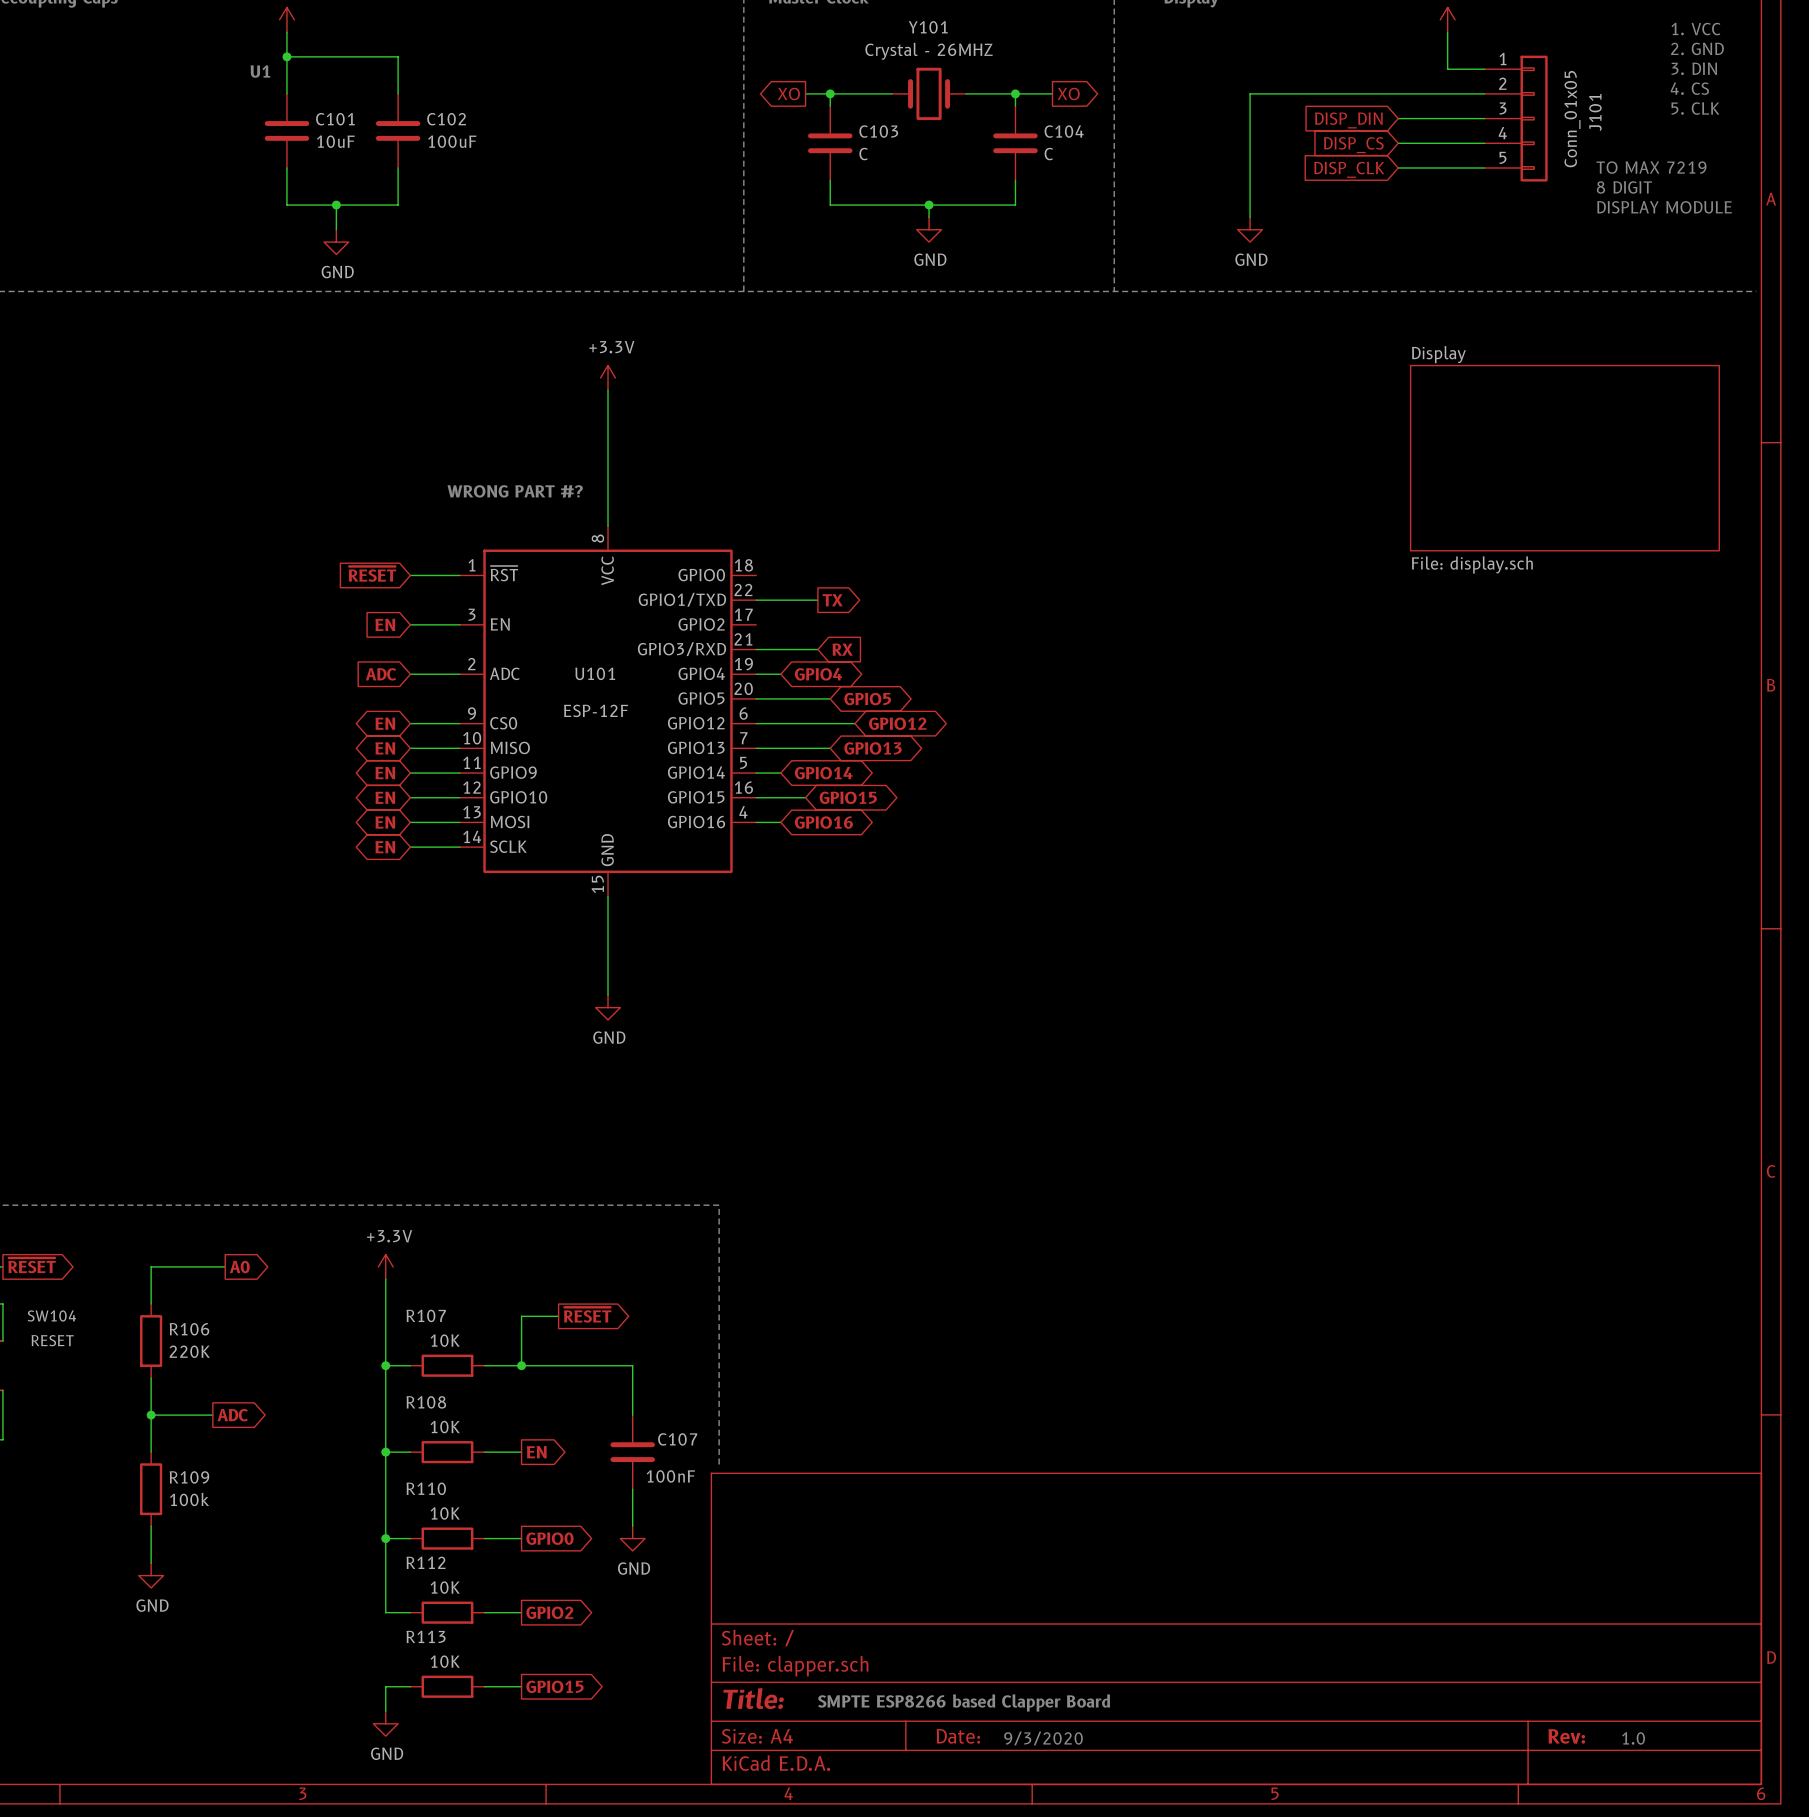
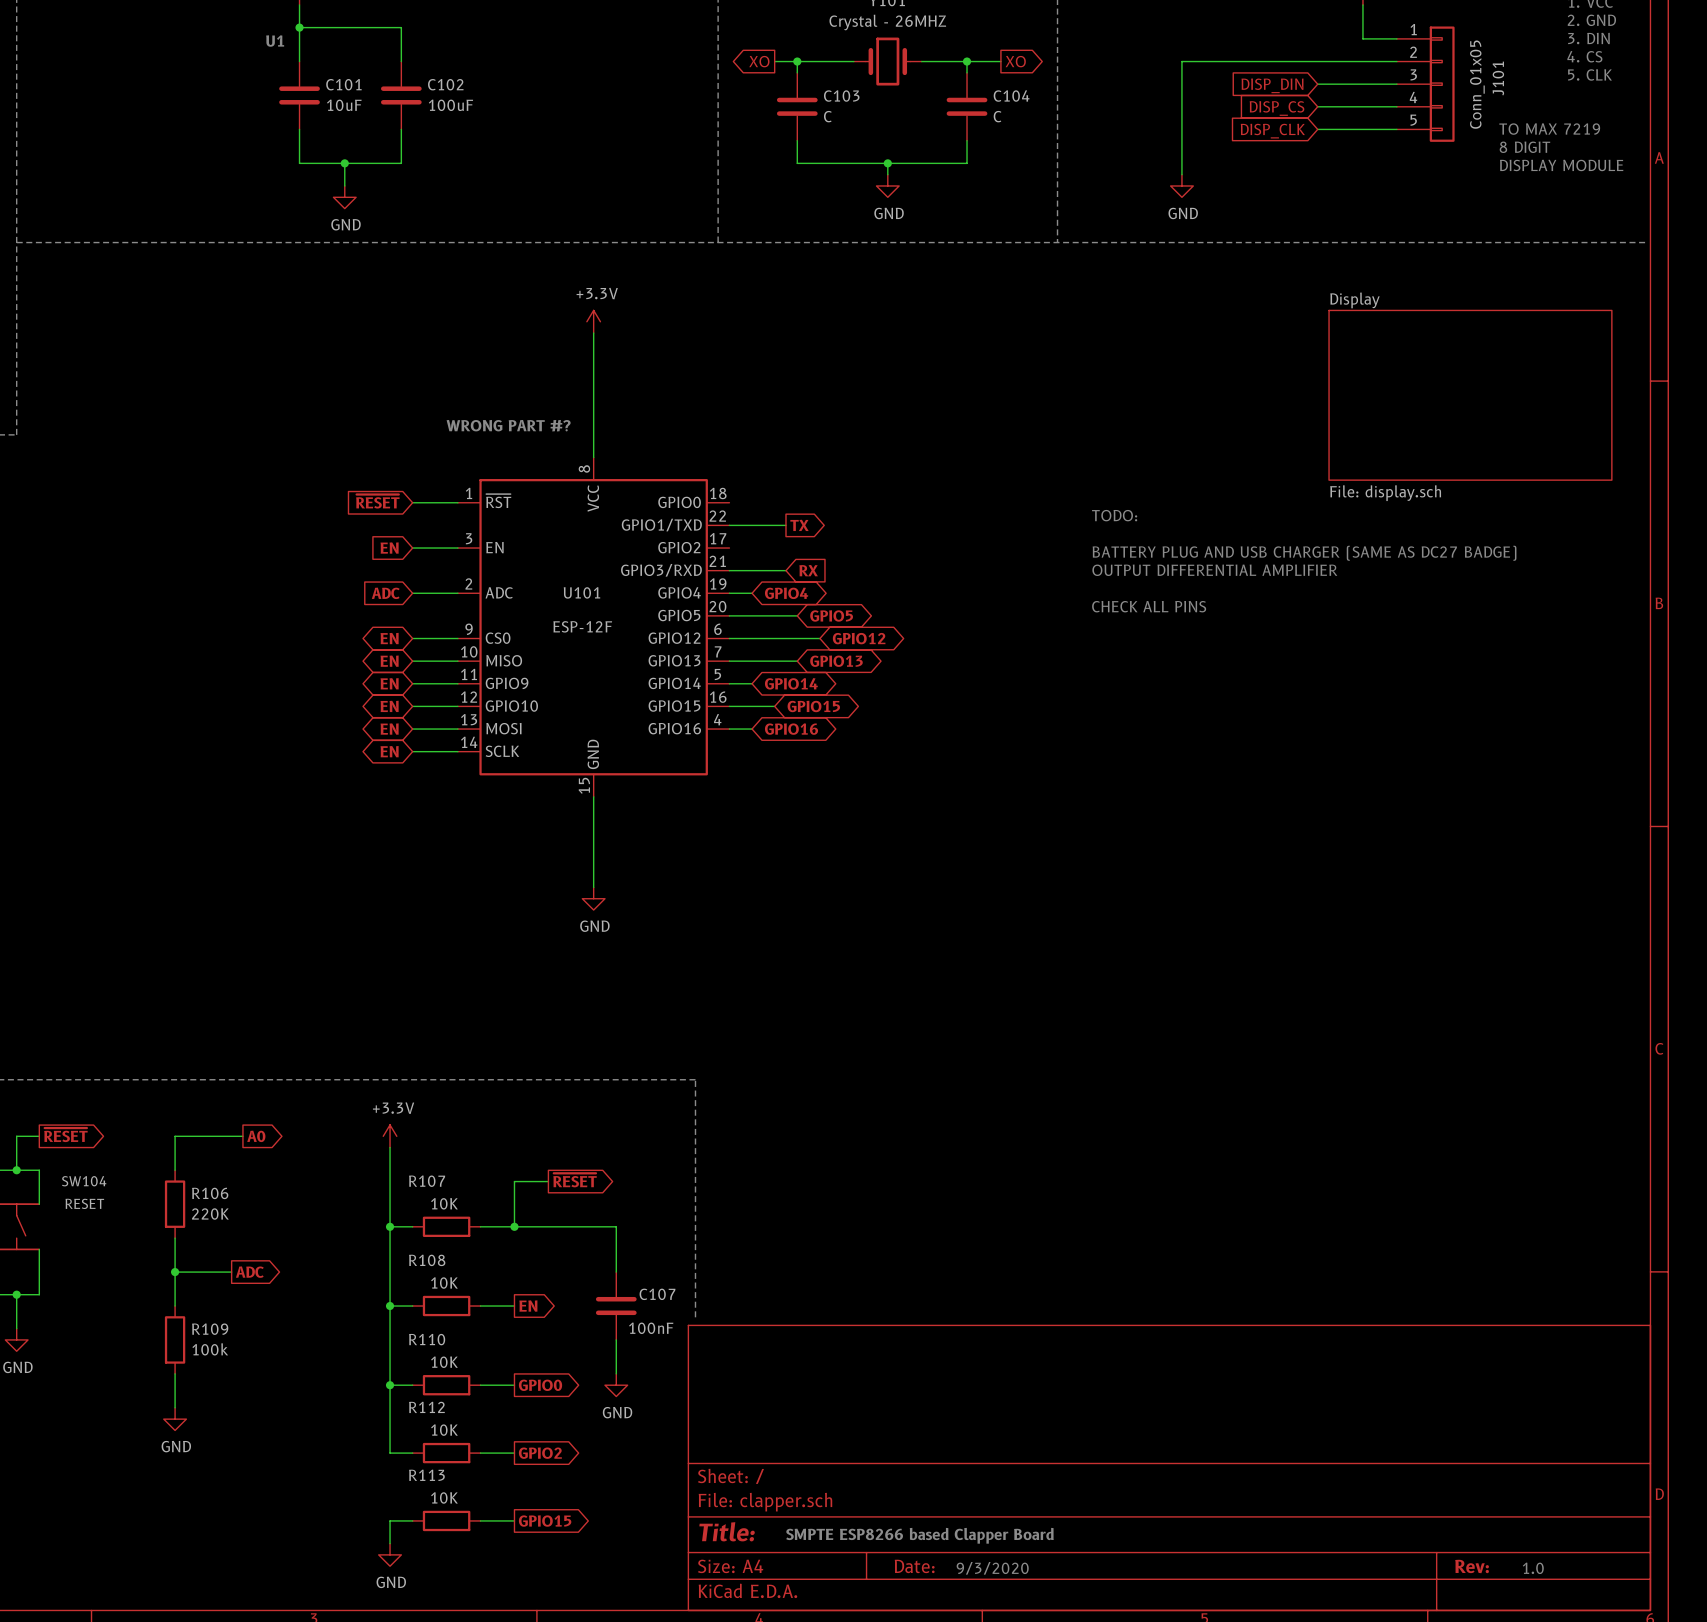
text: none -> TODO: (1114, 515)
text: none -> BATTERY PLUG AND USB CHARGER (SAME AS DC27 BADGE) (1304, 553)
text: none -> OUTPUT DIFFERENTIAL AMPLIFIER (1214, 570)
text: none -> CHECK ALL PINS (1149, 606)

